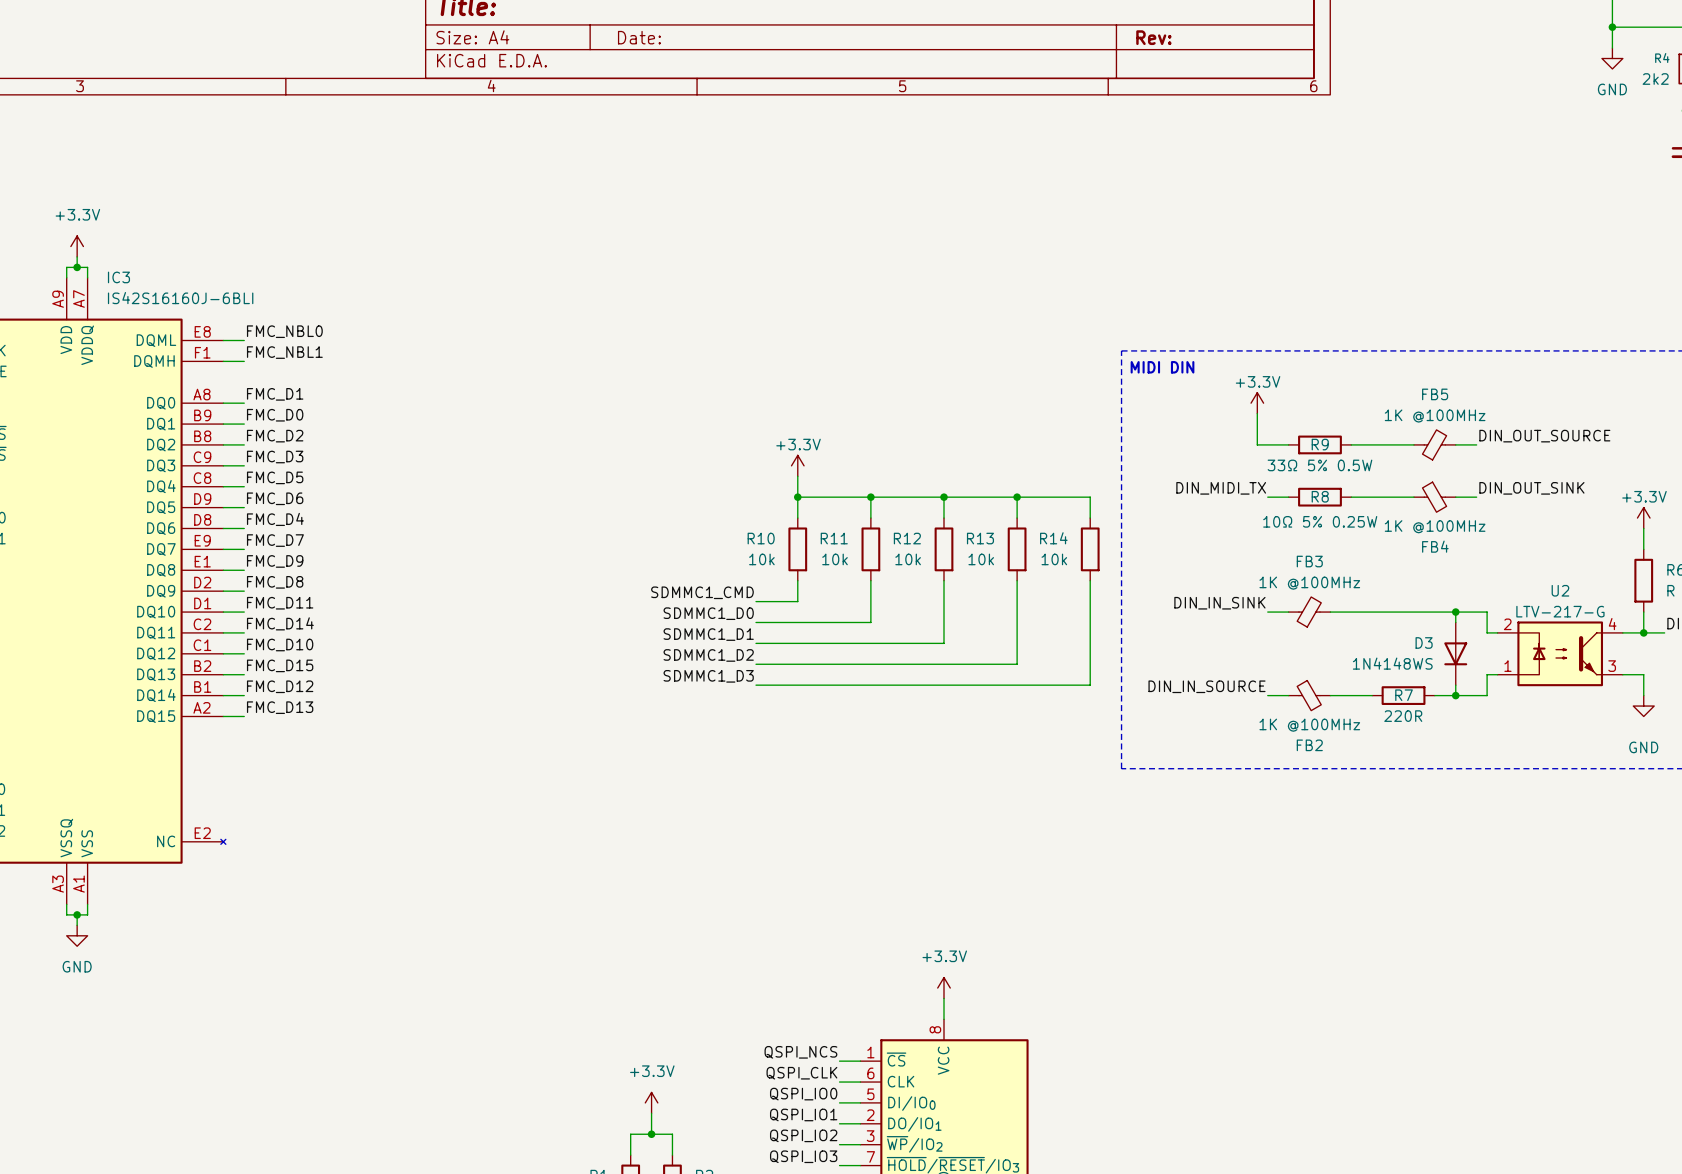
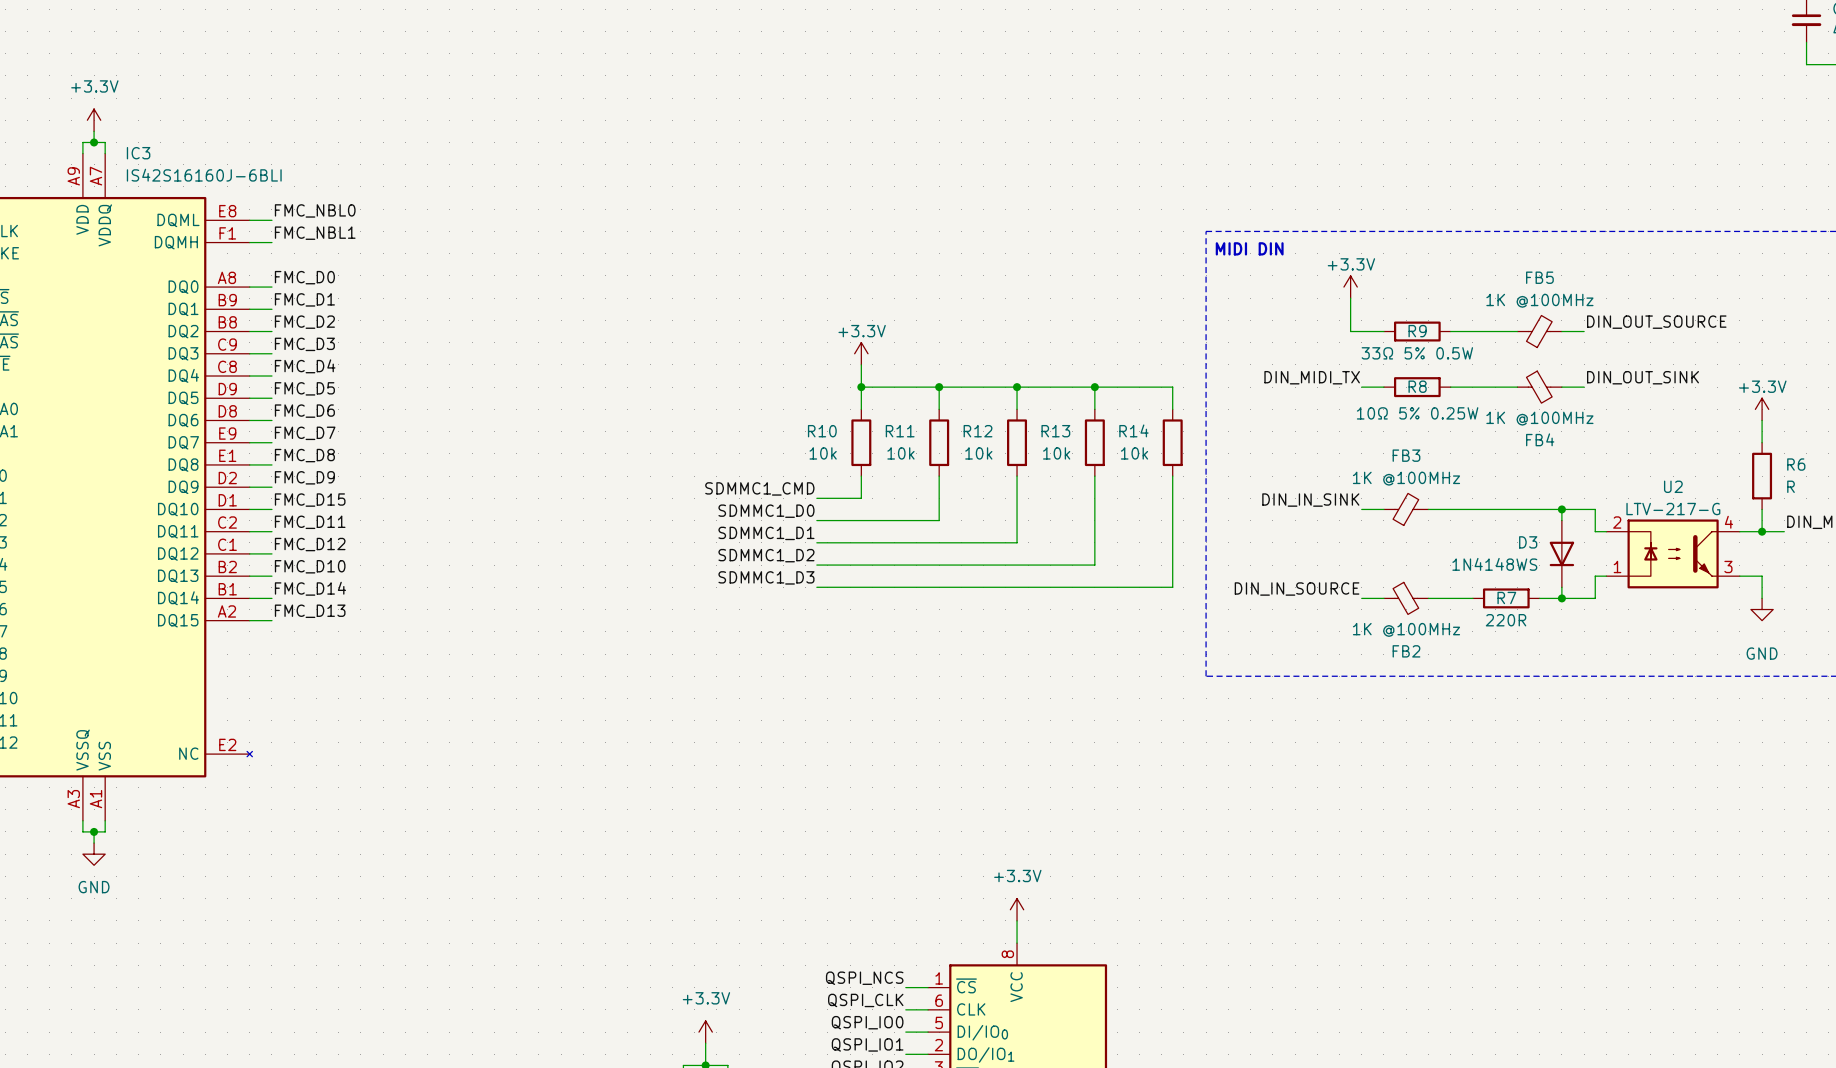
label: FMC_D1 (275, 394) -> FMC_D0 (304, 277)
label: FMC_D0 (275, 415) -> FMC_D1 (304, 299)
label: FMC_D5 (275, 477) -> FMC_D4 (305, 366)
label: FMC_D6 (275, 498) -> FMC_D5 (304, 388)
label: FMC_D4 (275, 519) -> FMC_D6 (304, 411)
label: FMC_D9 (275, 561) -> FMC_D8 (304, 455)
label: FMC_D8 (275, 582) -> FMC_D9 (304, 477)
label: FMC_D11 (280, 603) -> FMC_D15 (310, 500)
label: FMC_D14 (280, 623) -> FMC_D11 (310, 522)
label: FMC_D10 (280, 645) -> FMC_D12 (310, 544)
label: FMC_D15 (280, 665) -> FMC_D10 (310, 566)
label: FMC_D12 (280, 686) -> FMC_D14 (310, 588)

